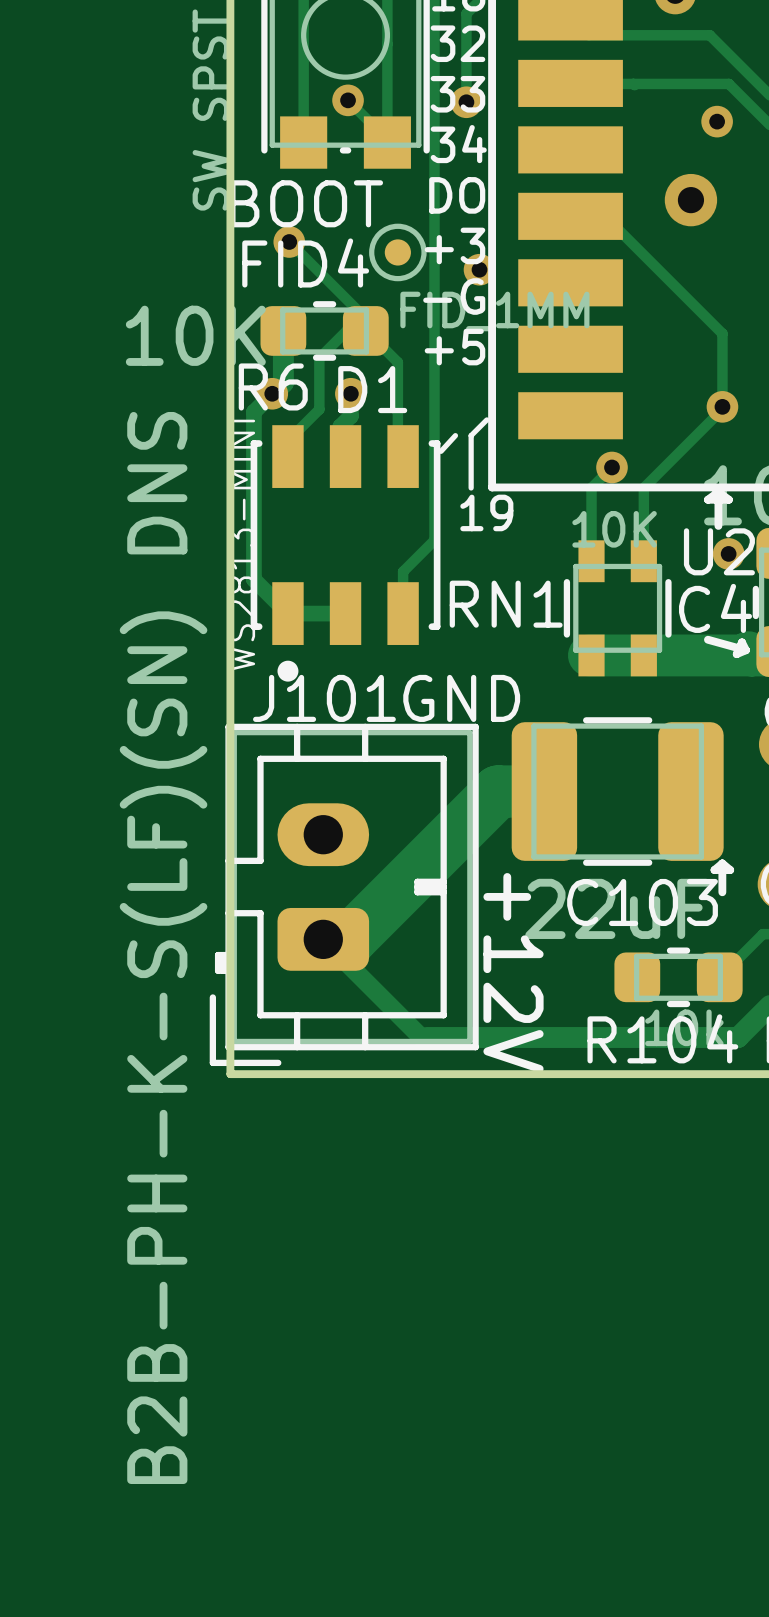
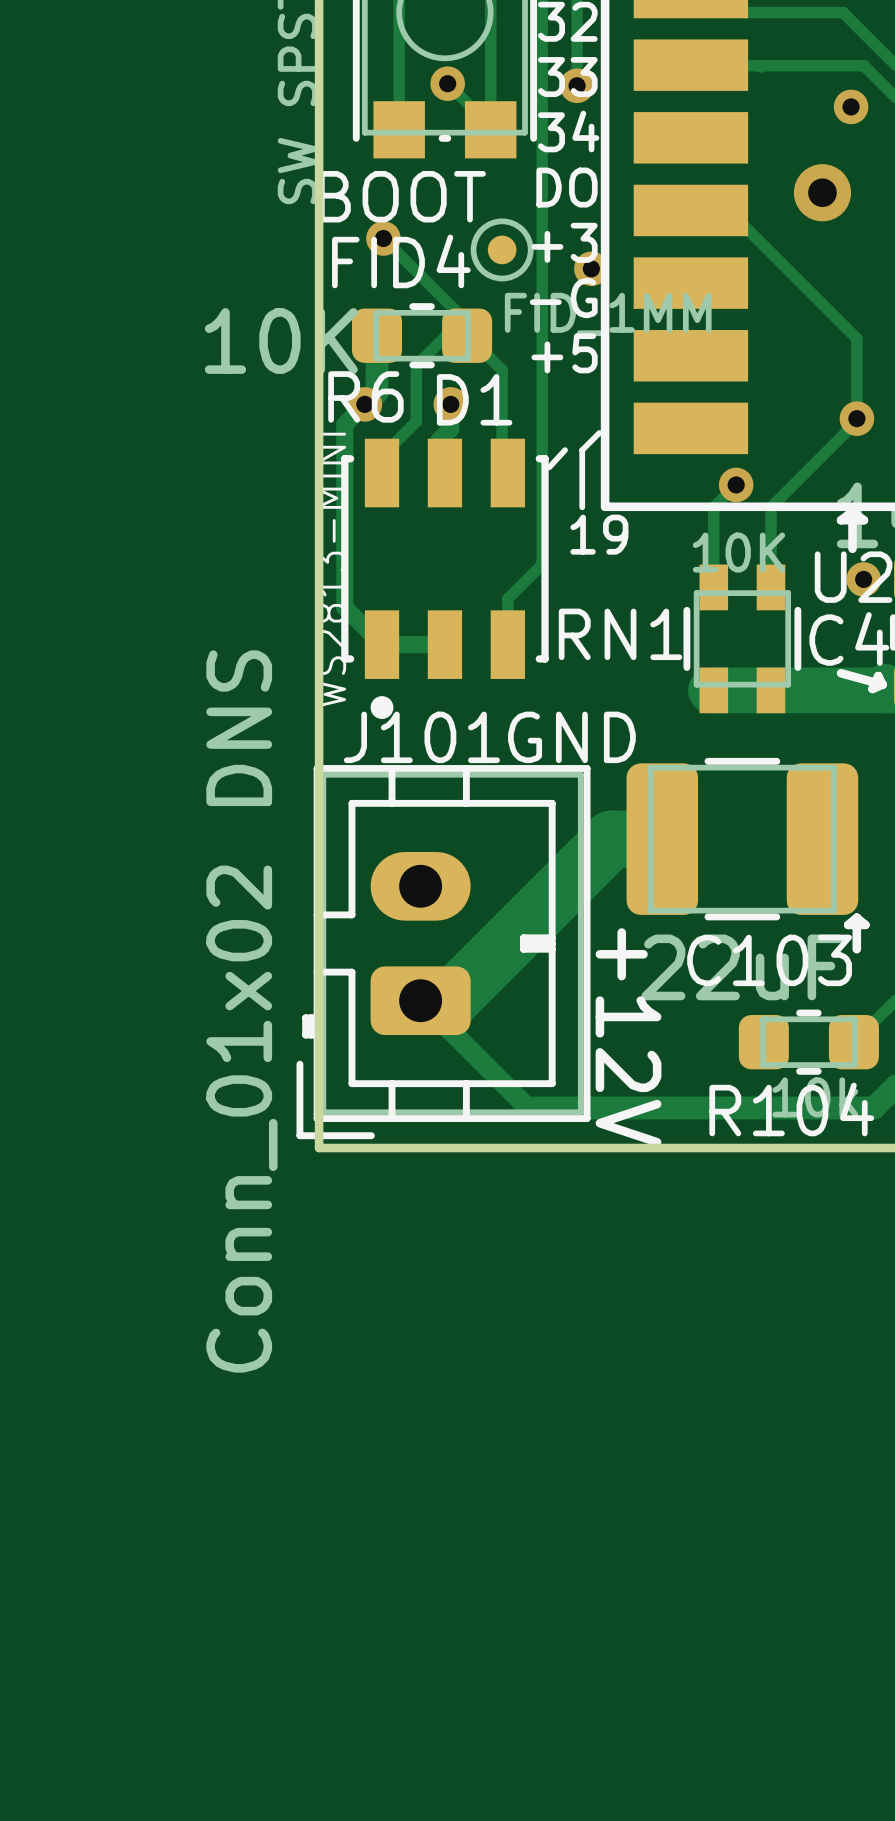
J101 value: B2B-PH-K-S(LF)(SN) DNS (163, 947) -> Conn_01x02 DNS (241, 1011)

